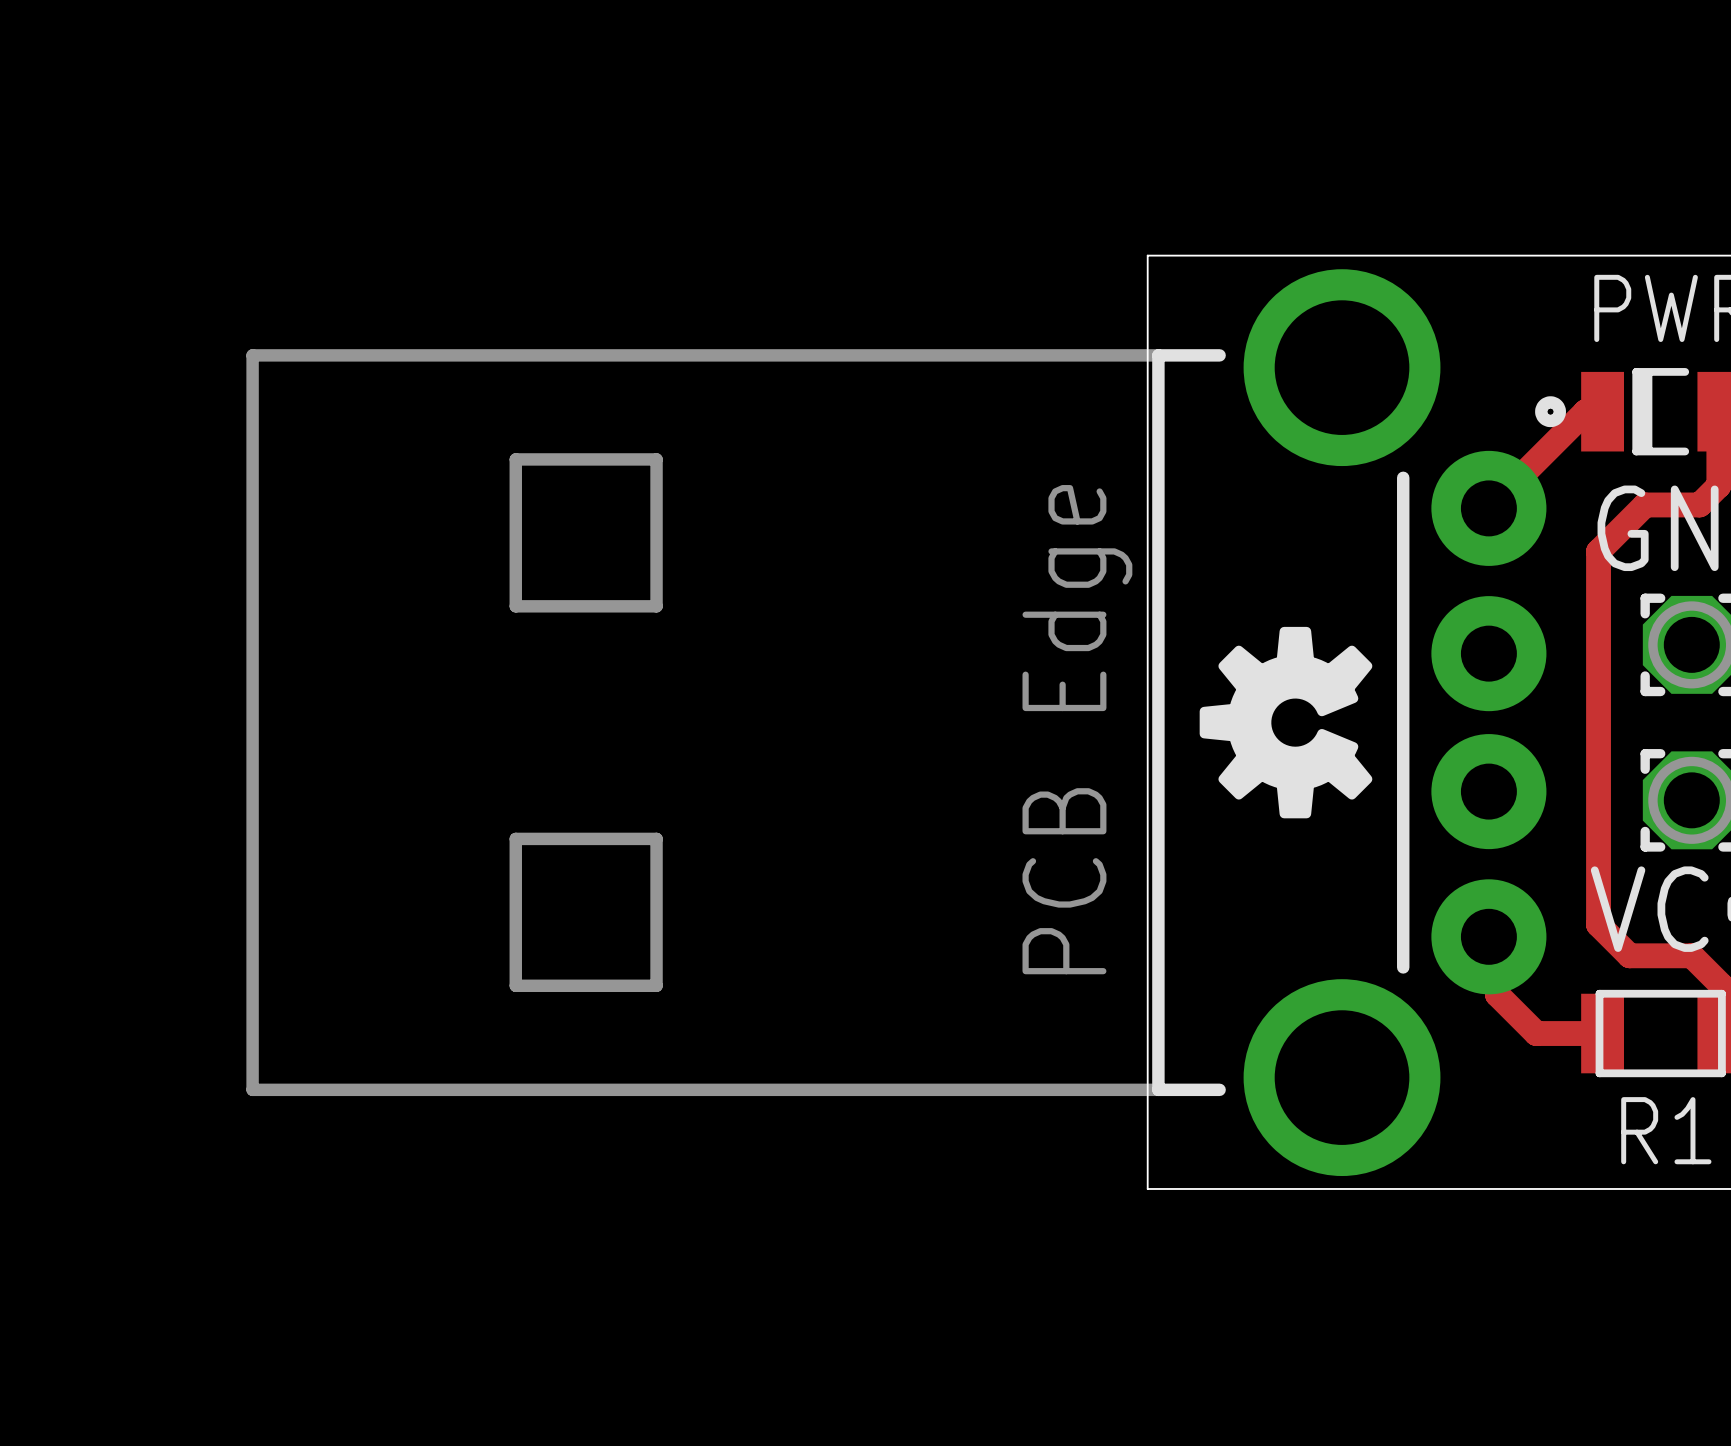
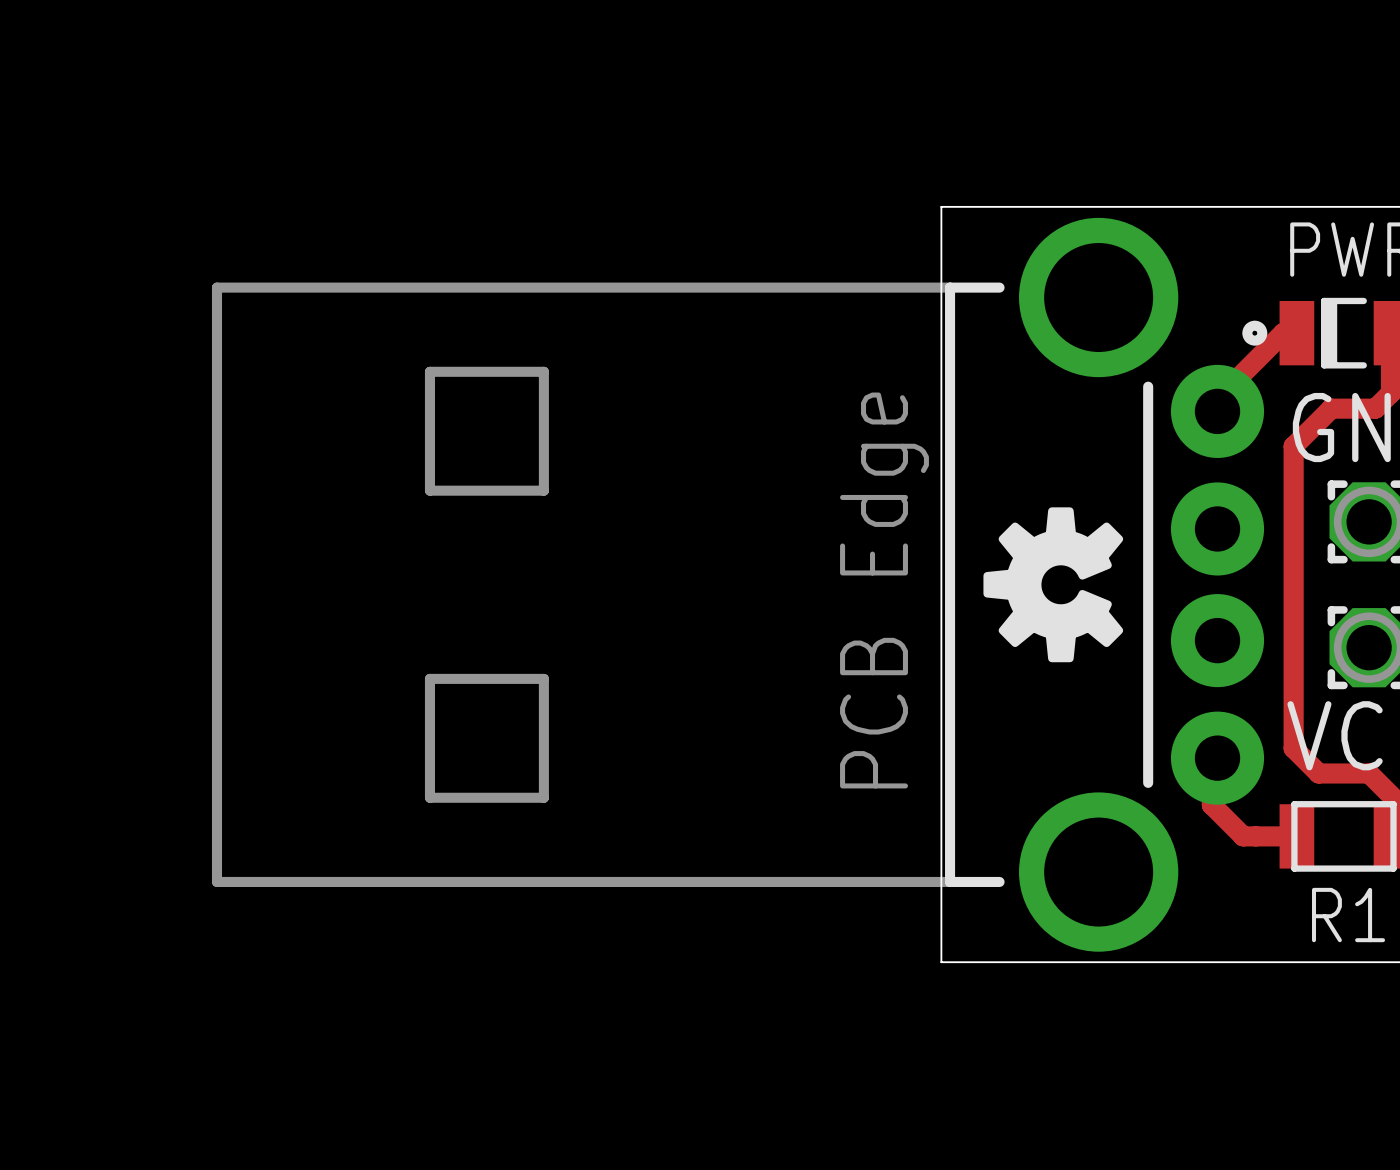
board edge: (1163, 255) (1147, 255) (1147, 1188) (1163, 1188) -> (941, 206) (941, 962)
part position: (896, 722) -> (738, 584)
drawing position: (1286, 722) -> (1053, 584)

